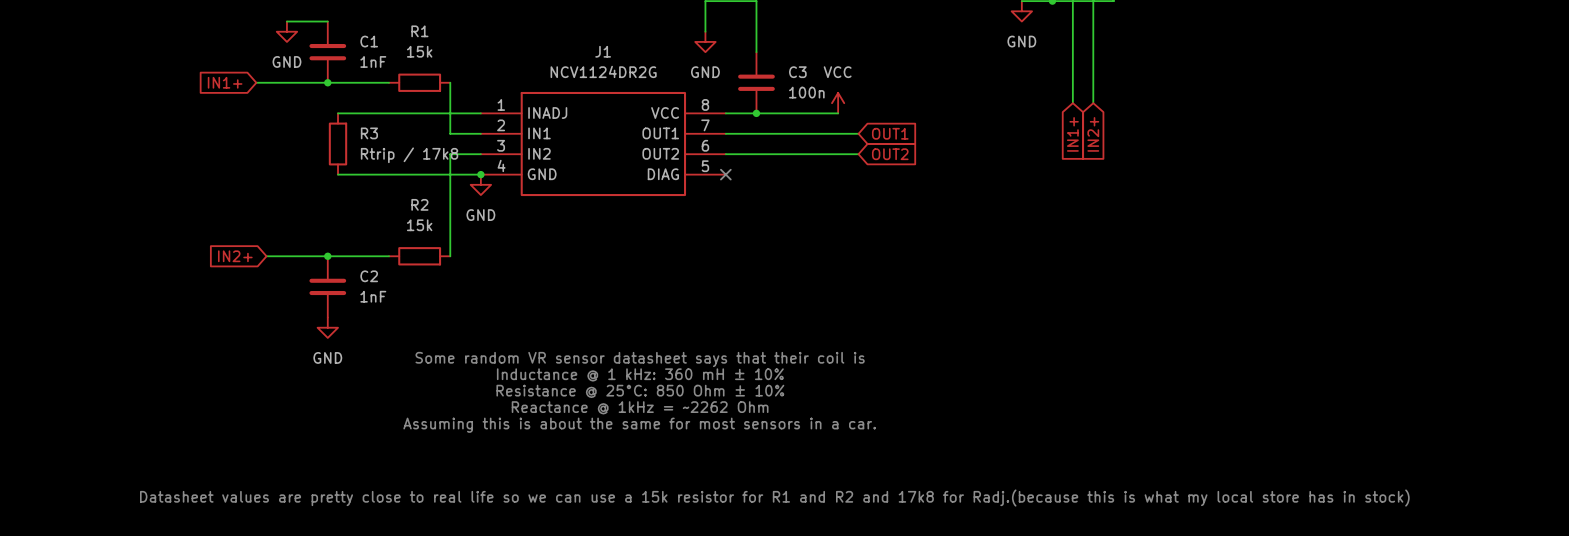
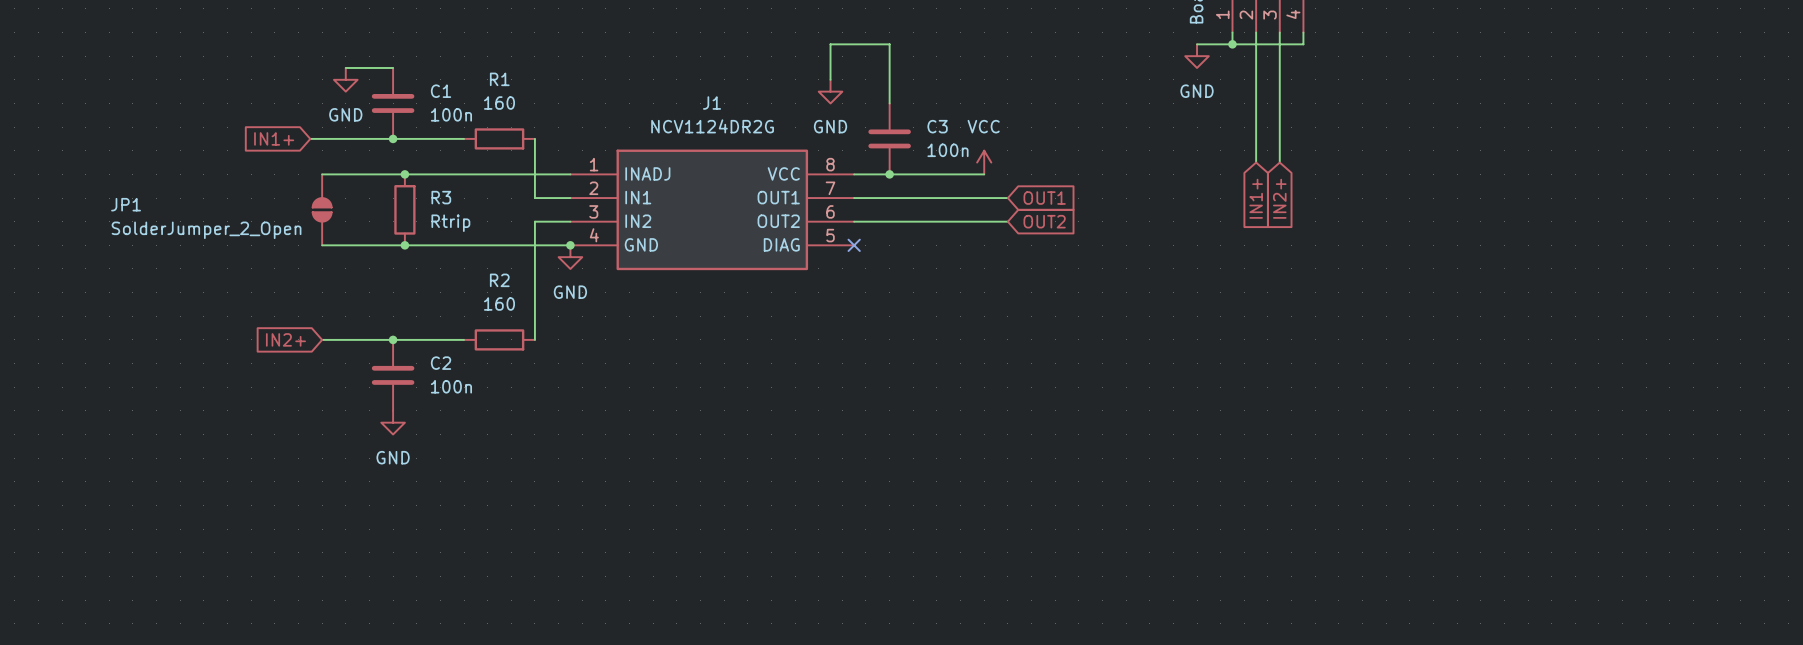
R1 value: 15k (419, 51) -> 160 (499, 103)
C1 value: 1nF (373, 61) -> 100n (451, 114)
wire: none -> (322, 174) (404, 174)
junction: none -> (404, 174)
JP1: none -> SolderJumper_2_Open (322, 209)
R3 value: Rtrip / 17k8 (409, 155) -> Rtrip (450, 223)
wire: none -> (322, 245) (404, 245)
junction: none -> (404, 245)
R2 value: 15k (419, 225) -> 160 (499, 304)
C2 value: 1nF (373, 296) -> 100n (451, 386)
text: Some random VR sensor datasheet says that their coil is (640, 359) -> none
text: Inductance @ 1 kHz: 360 mH ± 10% (640, 374) -> none
text: Resistance @ 25°C: 850 Ohm ± 10% (640, 391) -> none
text: Reactance @ 1kHz = ~2262 Ohm (640, 407) -> none
text: Assuming this is about the same for most sensors in a car. (639, 425) -> none
text: Datasheet values are pretty close to real life so we can use a 15k resistor for R1 and R2 and 17k8 for Radj.(because this is what my local store has in stock) (774, 498) -> none

